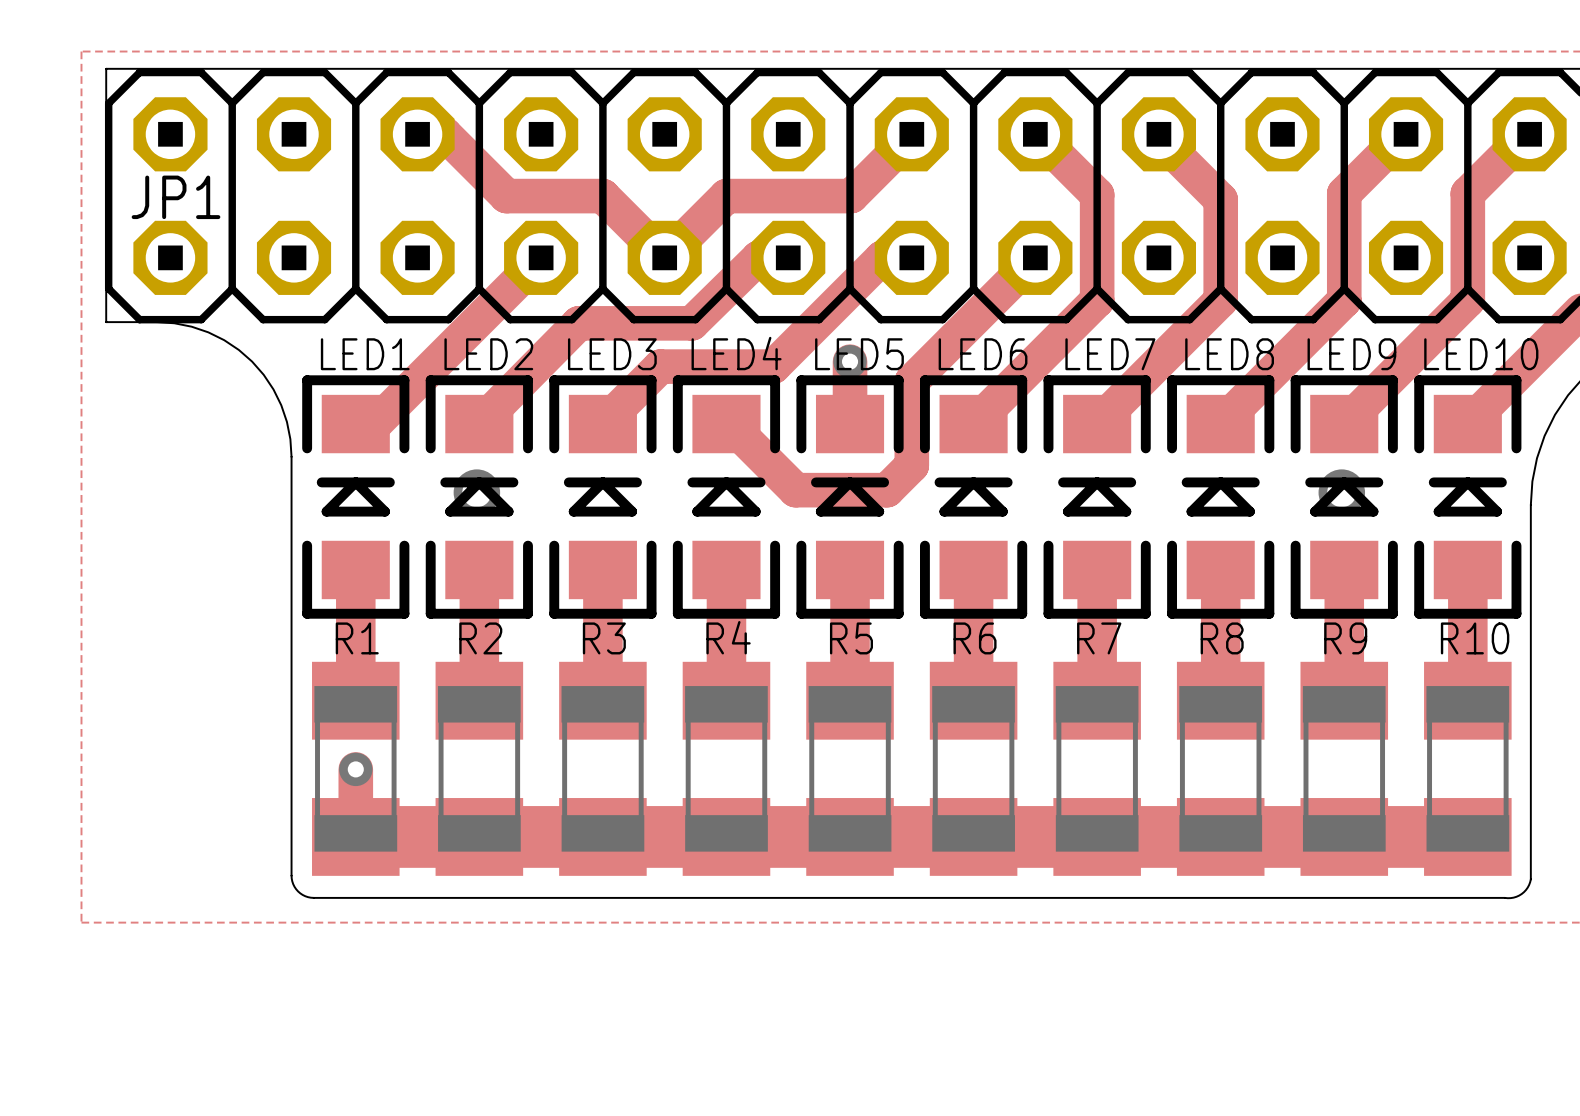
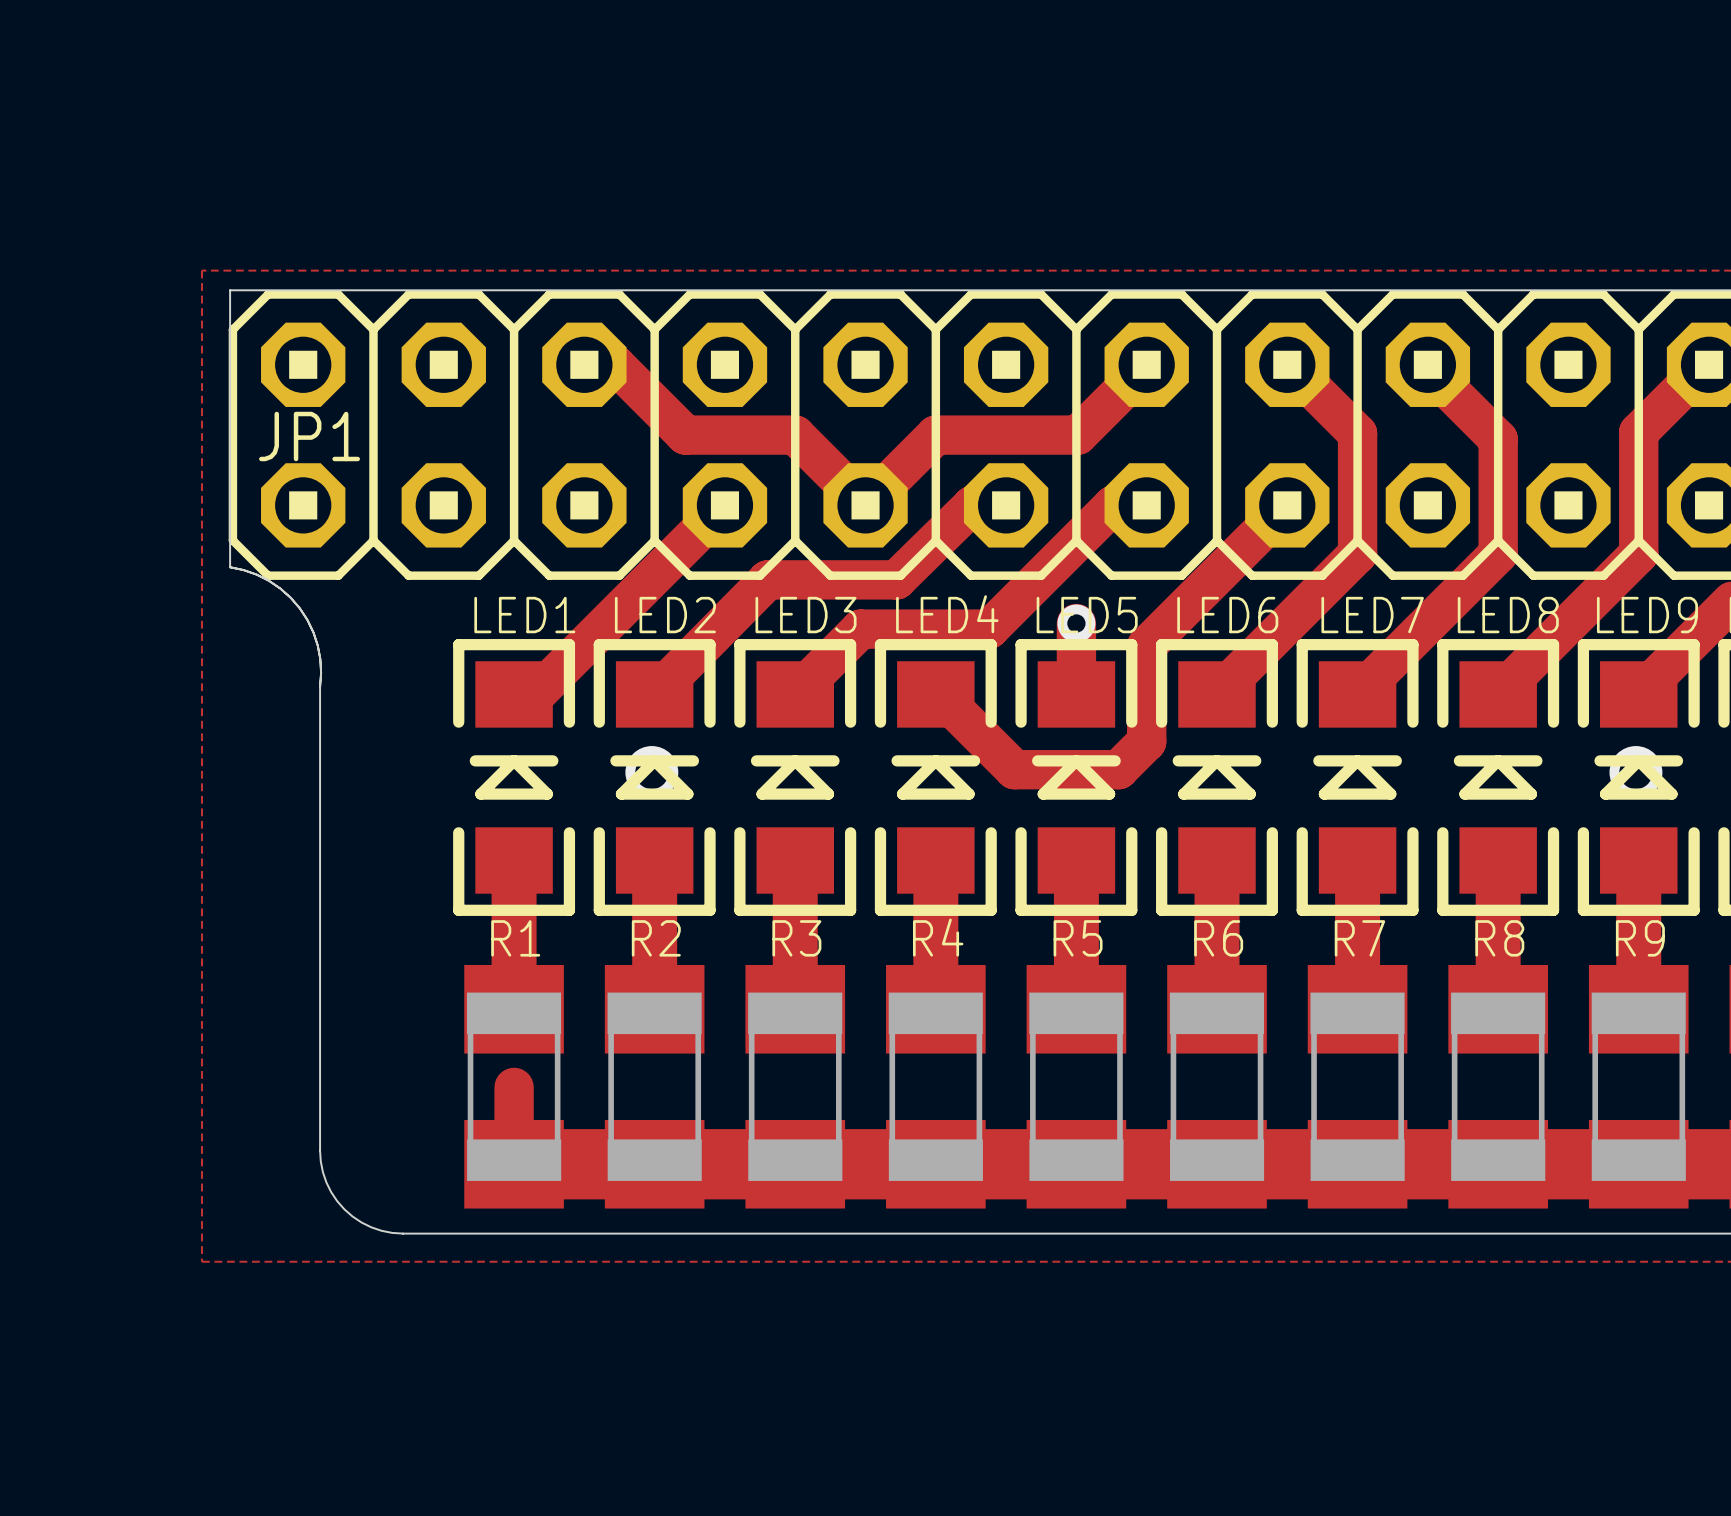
board edge: (106, 312) (106, 322) (174, 323) (191, 326) (224, 340) (252, 361) (263, 374) (281, 405) (286, 421) (291, 456) (291, 878) (298, 891) (305, 896) (313, 897) -> (320, 686) (320, 1150) (322, 1172) (331, 1192) (344, 1209) (371, 1227) (392, 1232) (466, 1233)
board edge: none -> (320, 686) (321, 672) (317, 645) (307, 619) (299, 608) (290, 597) (269, 580) (256, 574) (230, 567) (243, 570) (256, 574) (269, 580) (280, 588) (290, 597) (299, 608) (307, 619) (313, 632) (317, 645) (320, 659) (321, 672) (320, 686)
via: (355, 769) -> none

